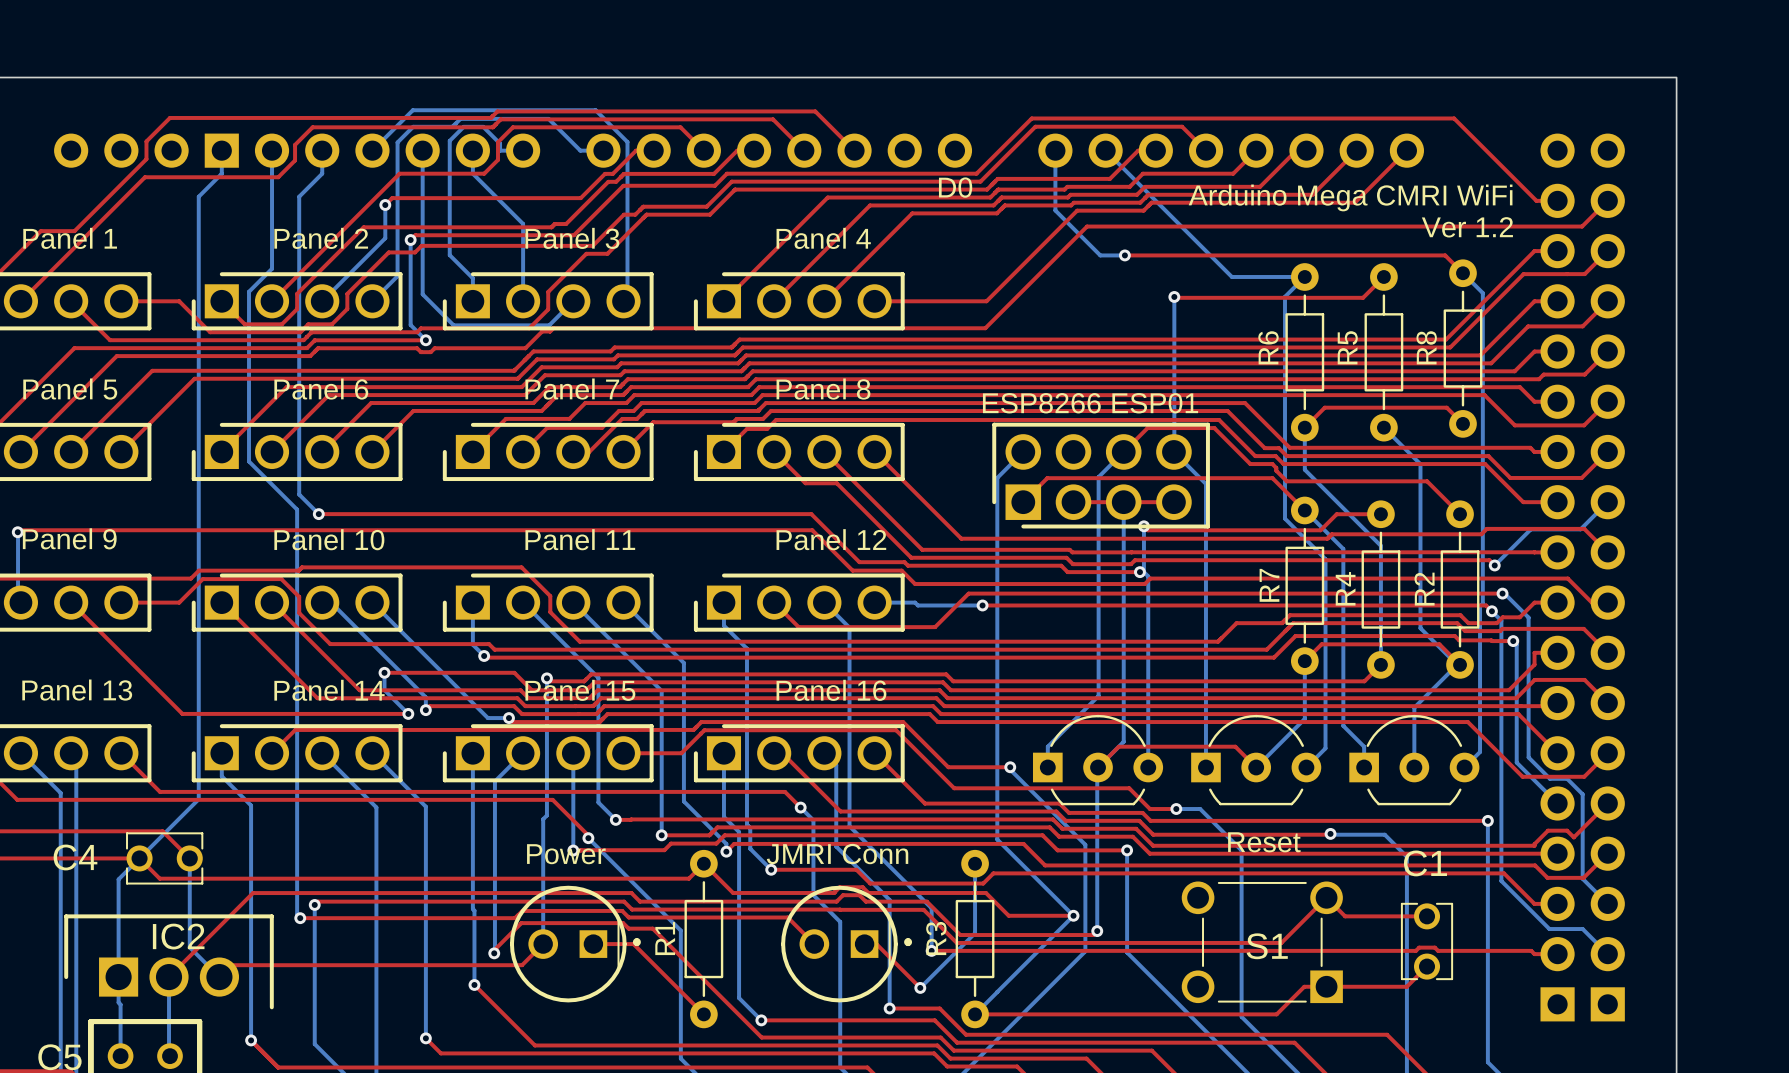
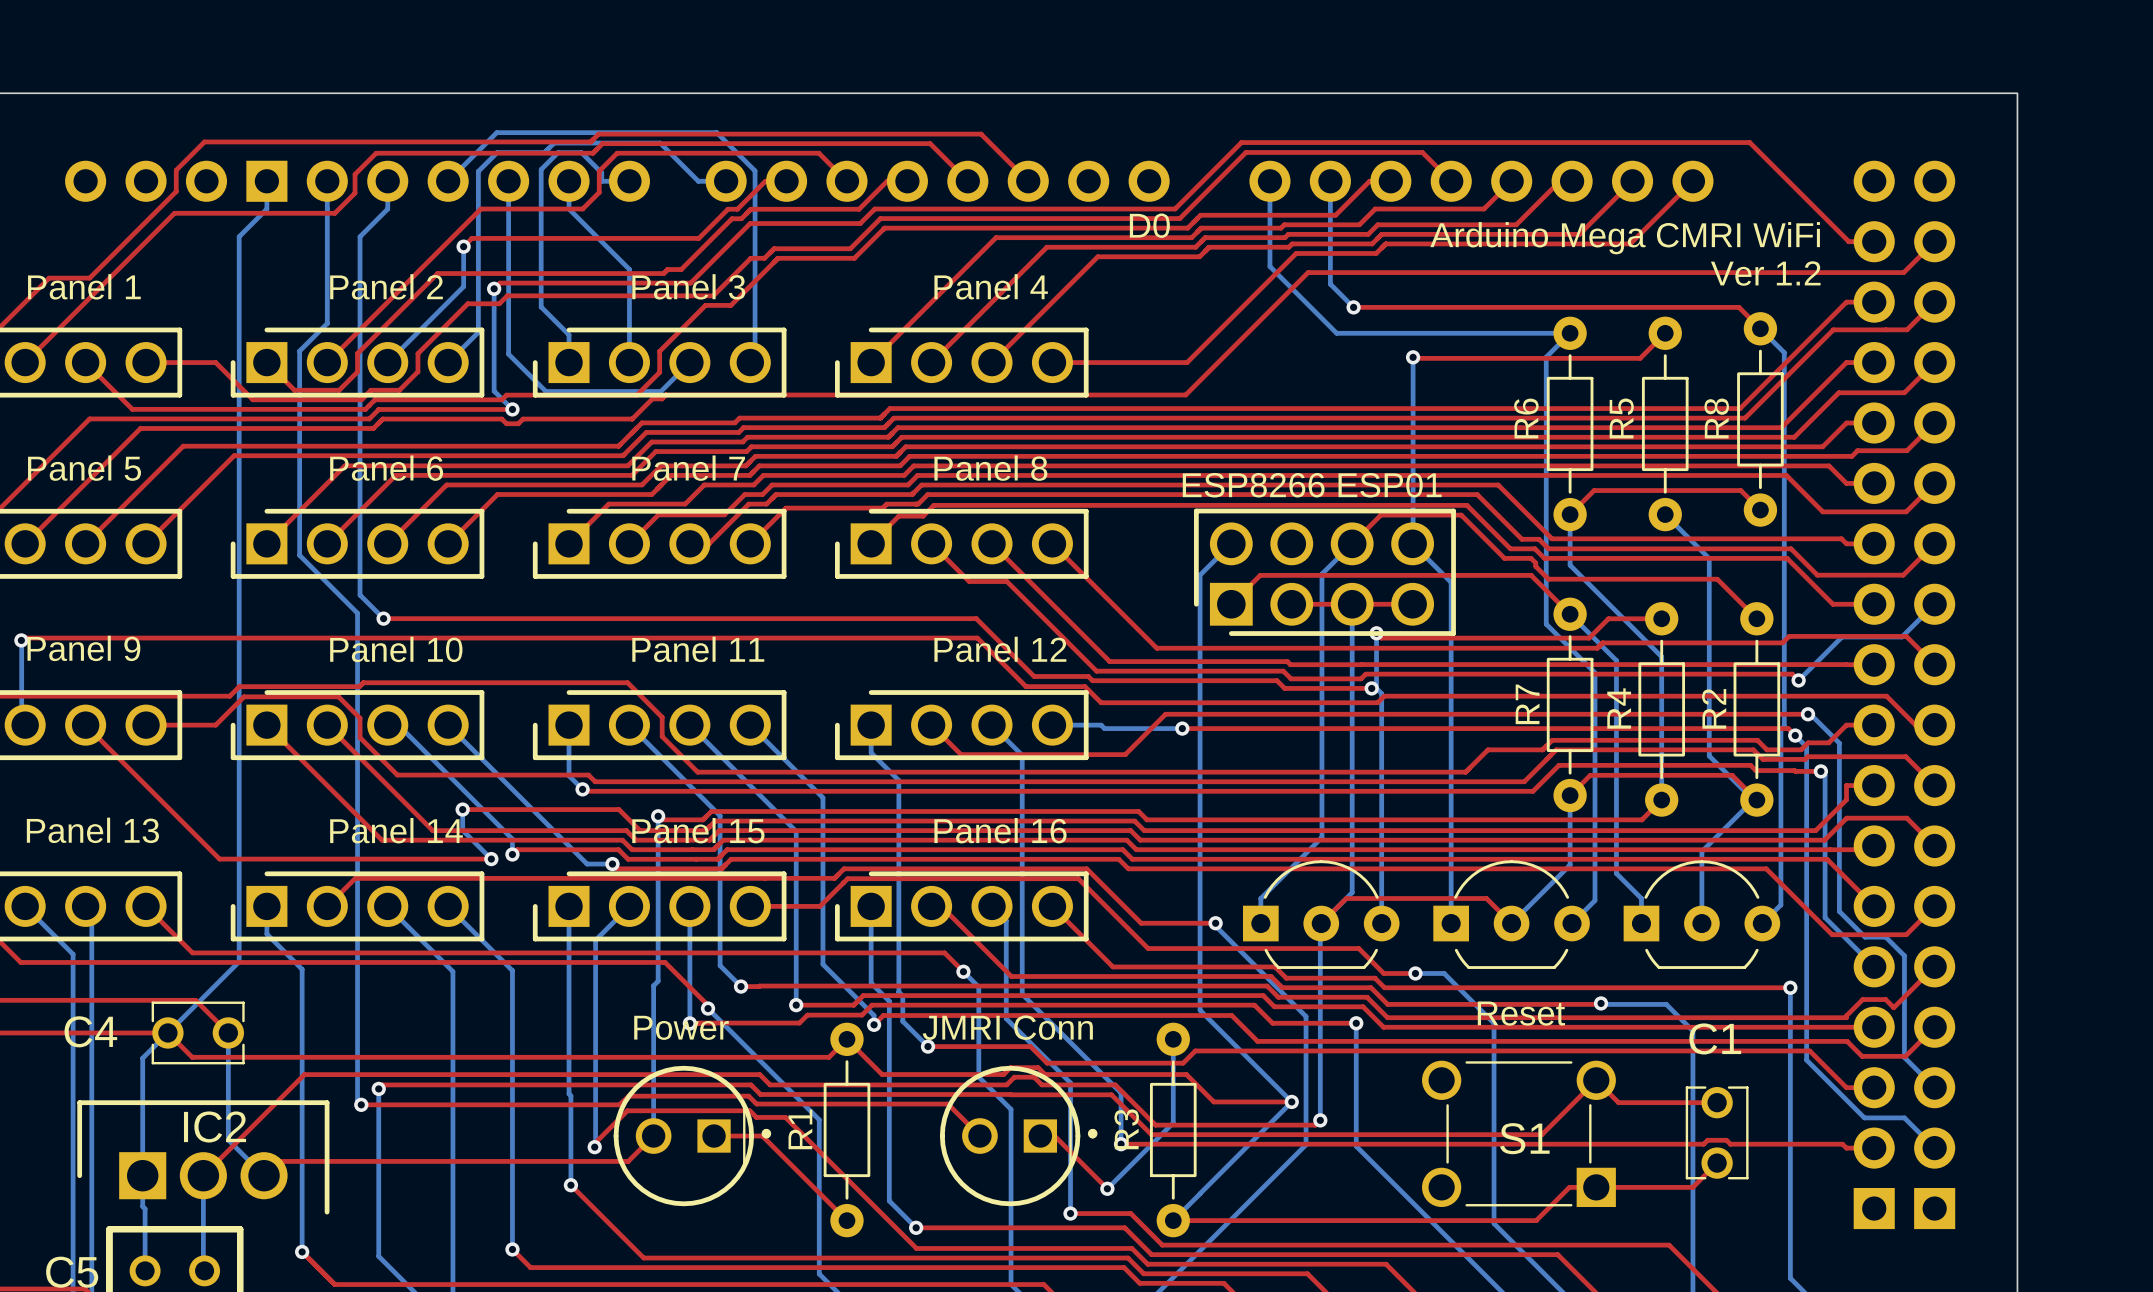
bottom track: (1105, 150) (1231, 276) -> (1269, 253) (1269, 266) (1336, 333) (1482, 333)
bottom track: (1055, 210) (1100, 255) (1124, 255) -> (1330, 181) (1330, 284) (1353, 307)

